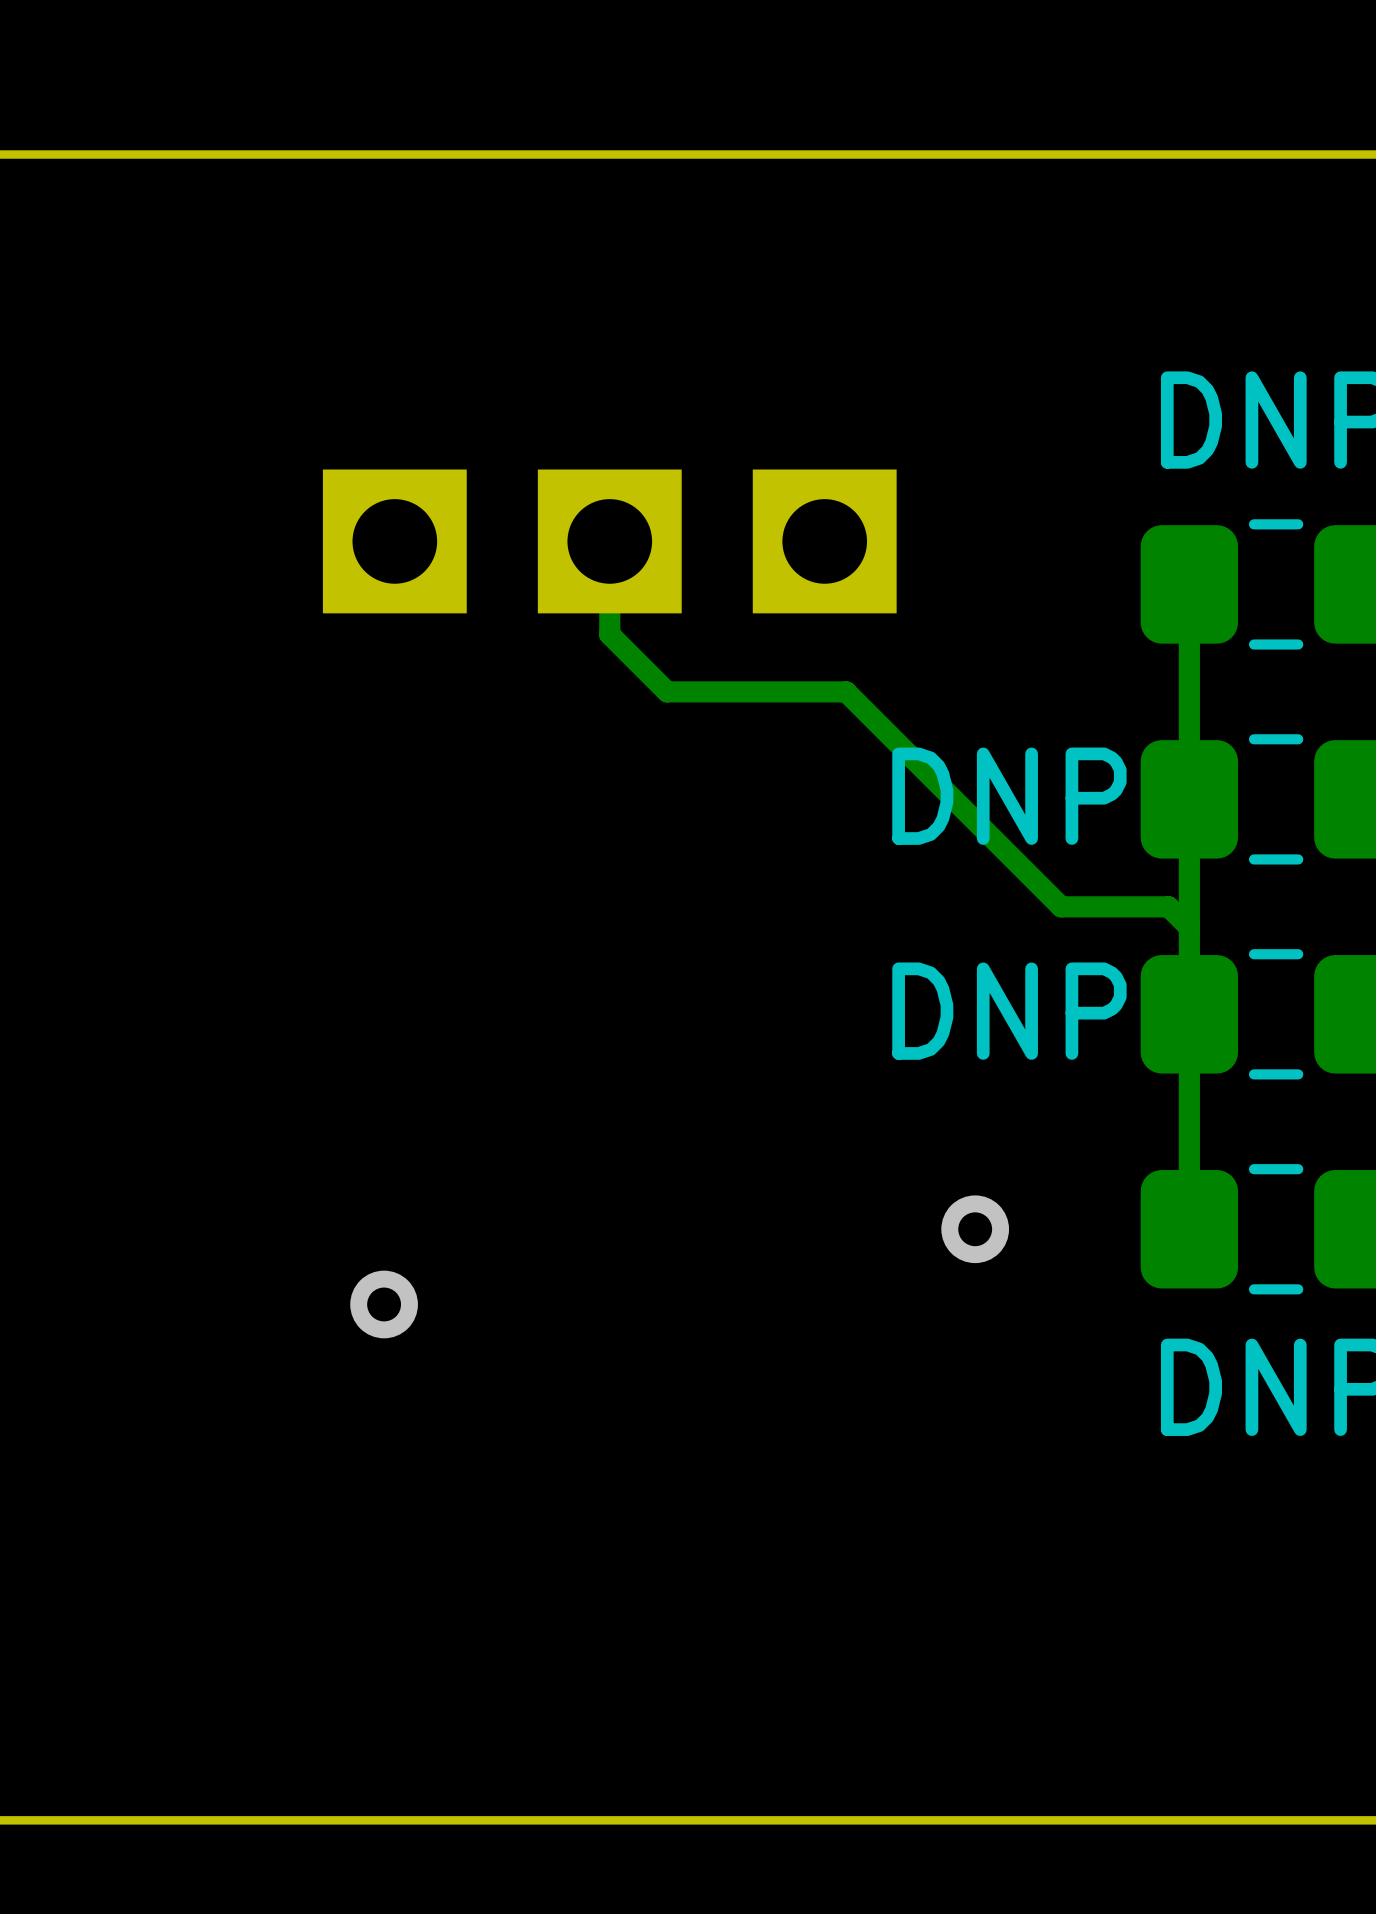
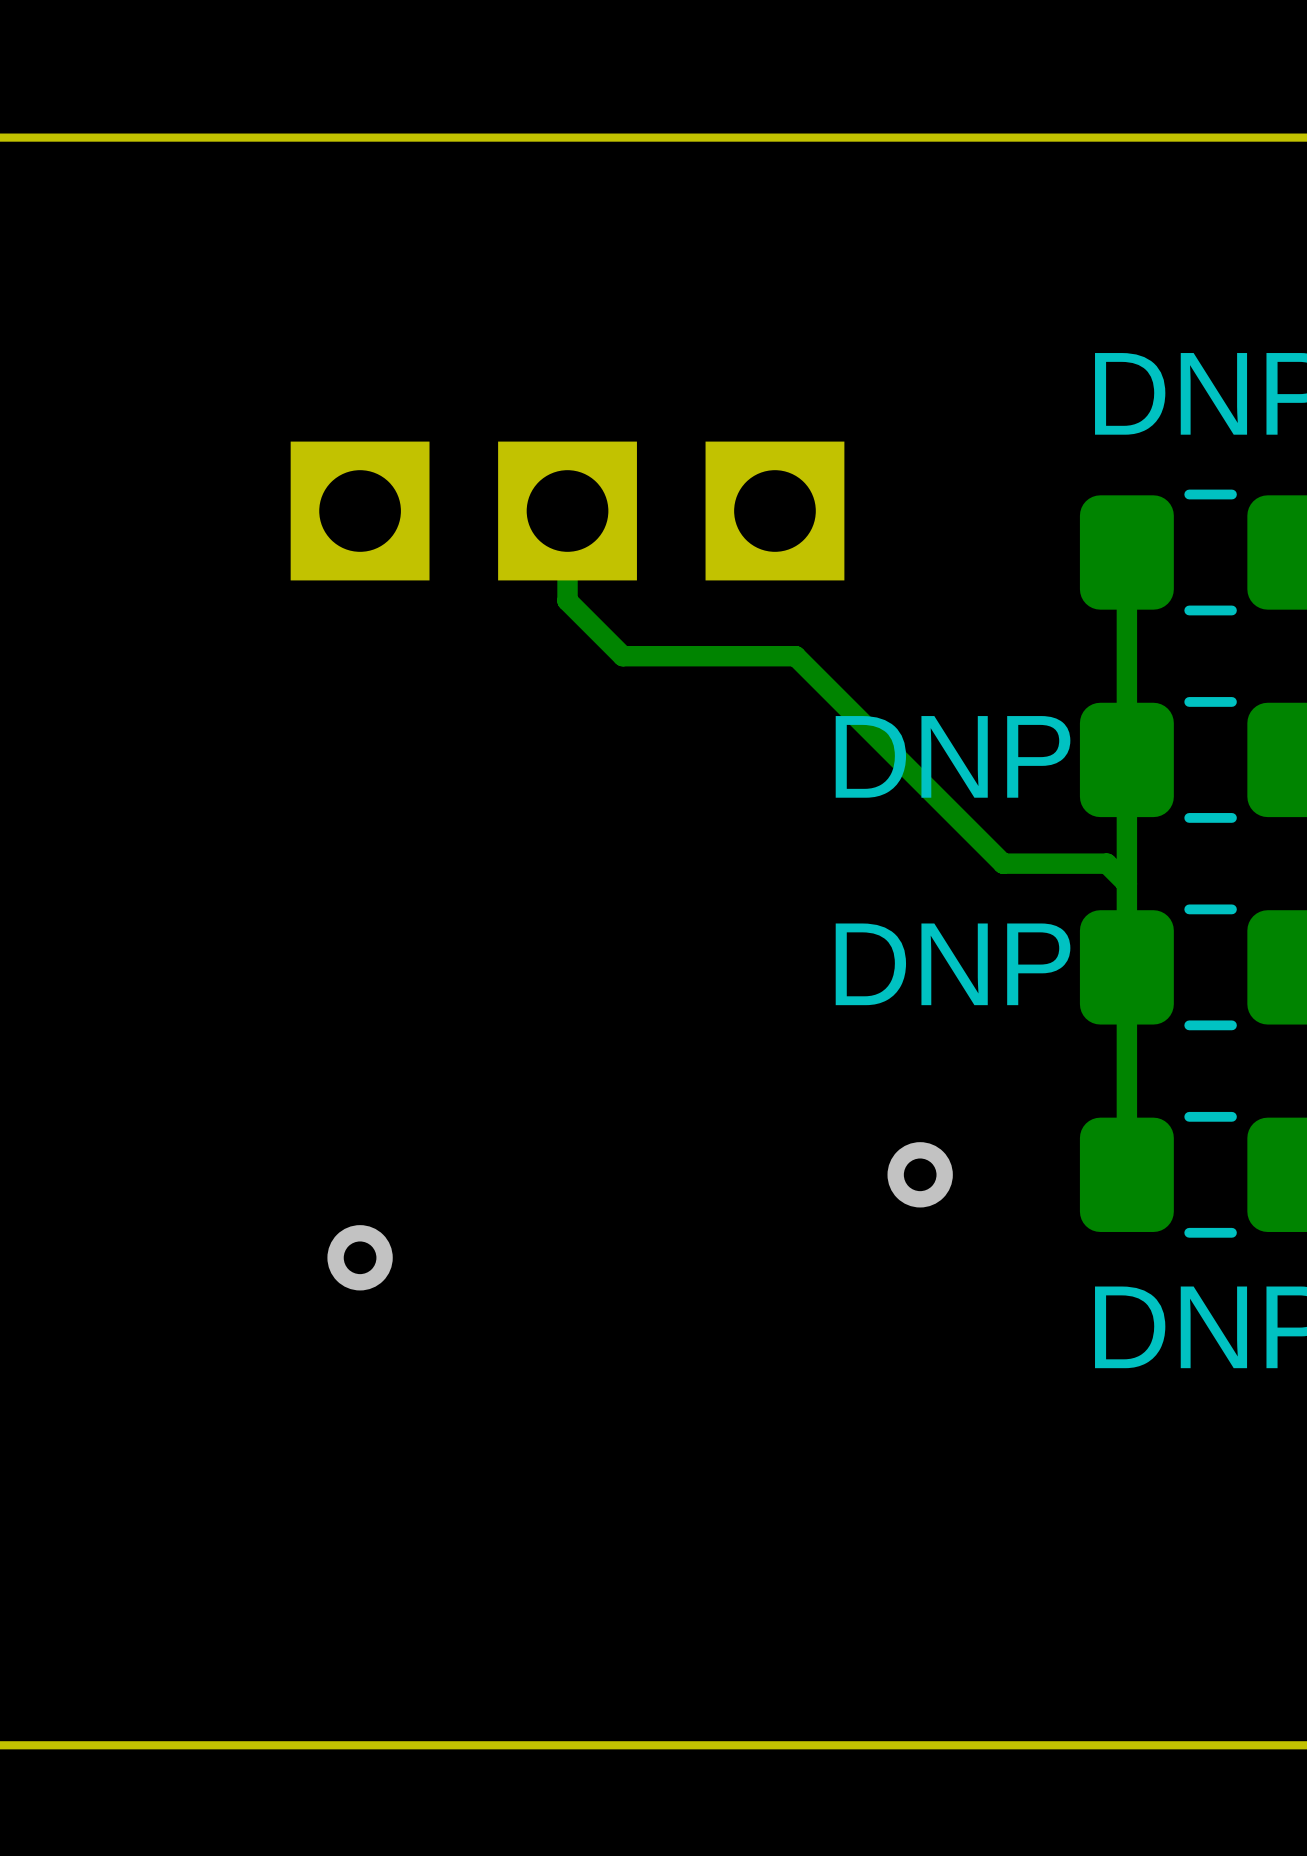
via position: (384, 1304) -> (360, 1257)

